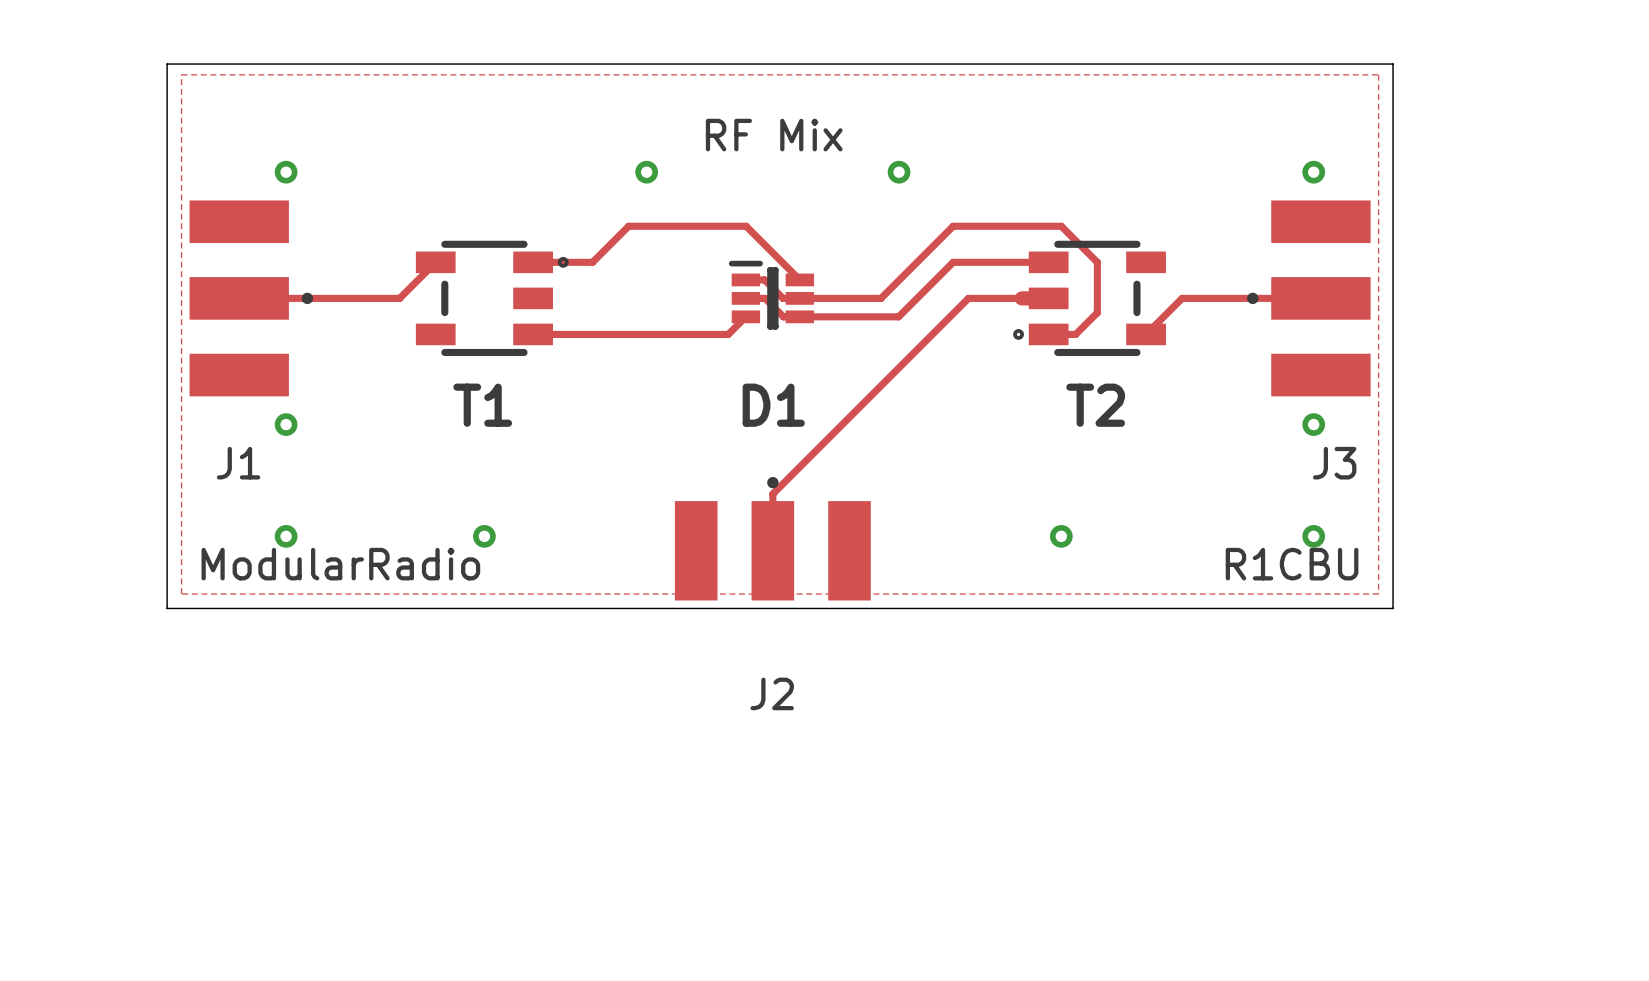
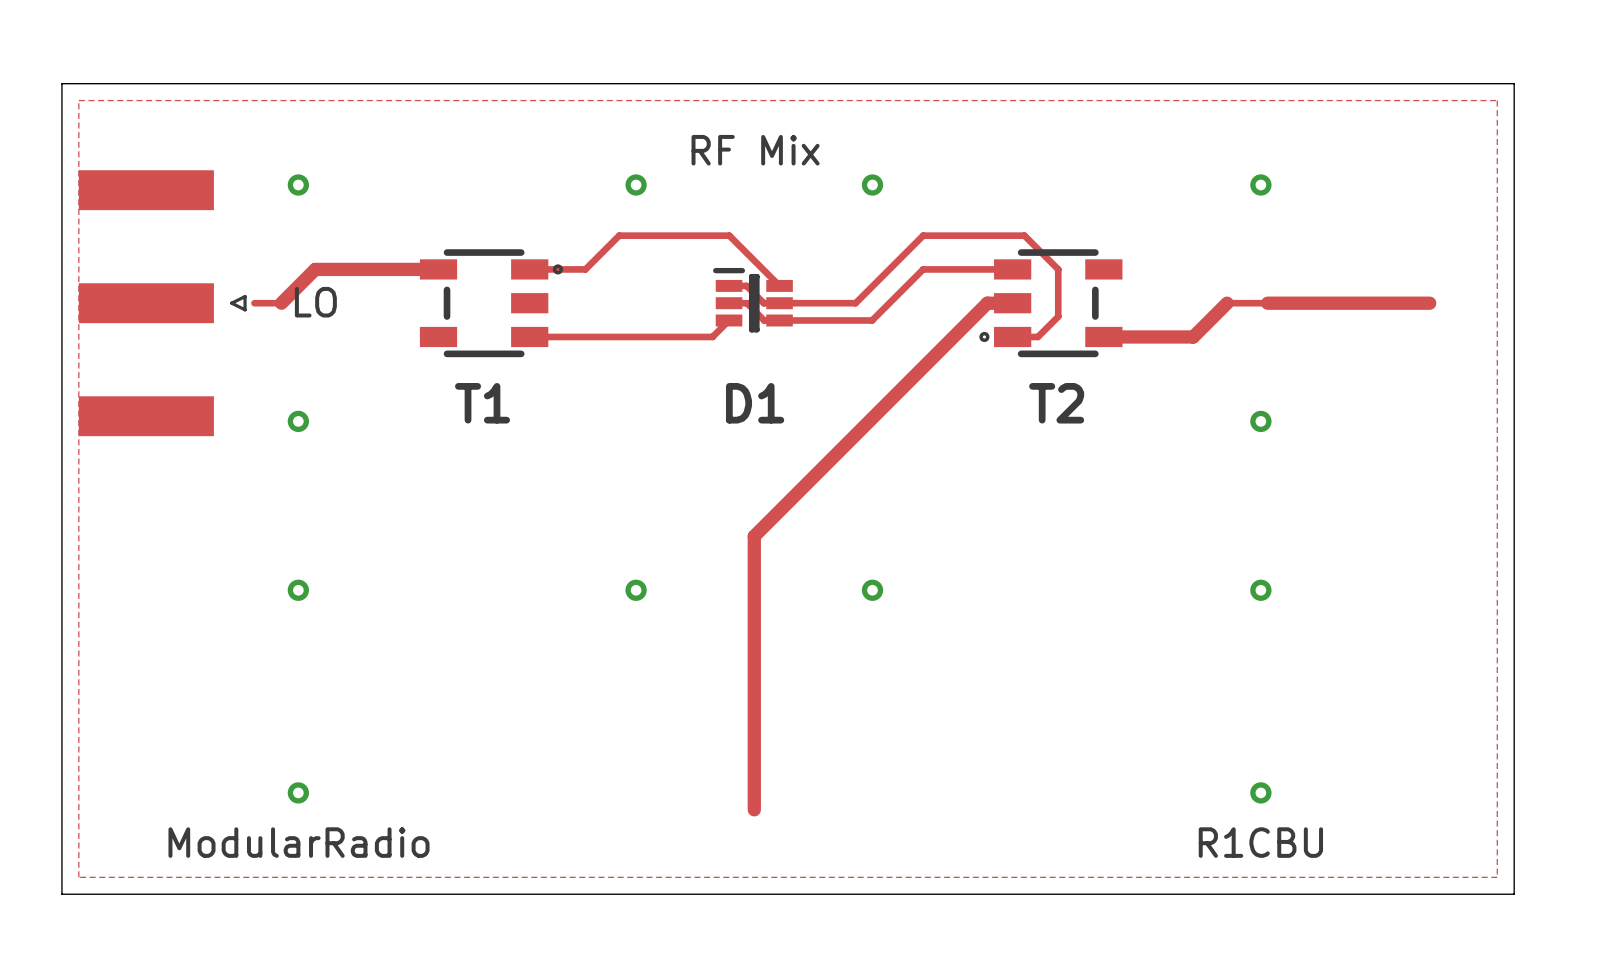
board edge: (167, 64) (167, 608) (1393, 608) (1393, 64) -> (186, 83) (61, 83) (61, 894) (1514, 894) (1514, 83) (1335, 83)
zone outline: (181, 74) (181, 594) (1378, 594) (1378, 74) (181, 74) -> none
zone outline: none -> (78, 100) (78, 877) (1497, 877) (1497, 100) (78, 100)
track: (435, 262) (399, 298) (268, 298) -> (438, 269) (315, 269) (281, 303)
LO: none -> (162, 303)
J1: (251, 298) -> none
track: (1048, 298) (968, 298) (772, 494) (772, 547) -> (987, 303) (754, 536)
track: (1277, 298) (1182, 298) (1146, 334) -> (1227, 303) (1193, 336) (1103, 336)
J3: (1308, 298) -> none
track: none -> (1267, 303) (1429, 303)
via position: (286, 536) -> (298, 590)
via: (484, 536) -> none
via: (1061, 536) -> none
via position: (1313, 536) -> (1260, 590)
J2: (772, 538) -> none
track: none -> (754, 539) (754, 809)
text position: ModularRadio (340, 564) -> ModularRadio (298, 842)
text position: R1CBU (1292, 564) -> R1CBU (1260, 842)
via: none -> (636, 590)
via: none -> (872, 590)
via: none -> (298, 792)
via: none -> (1260, 792)

